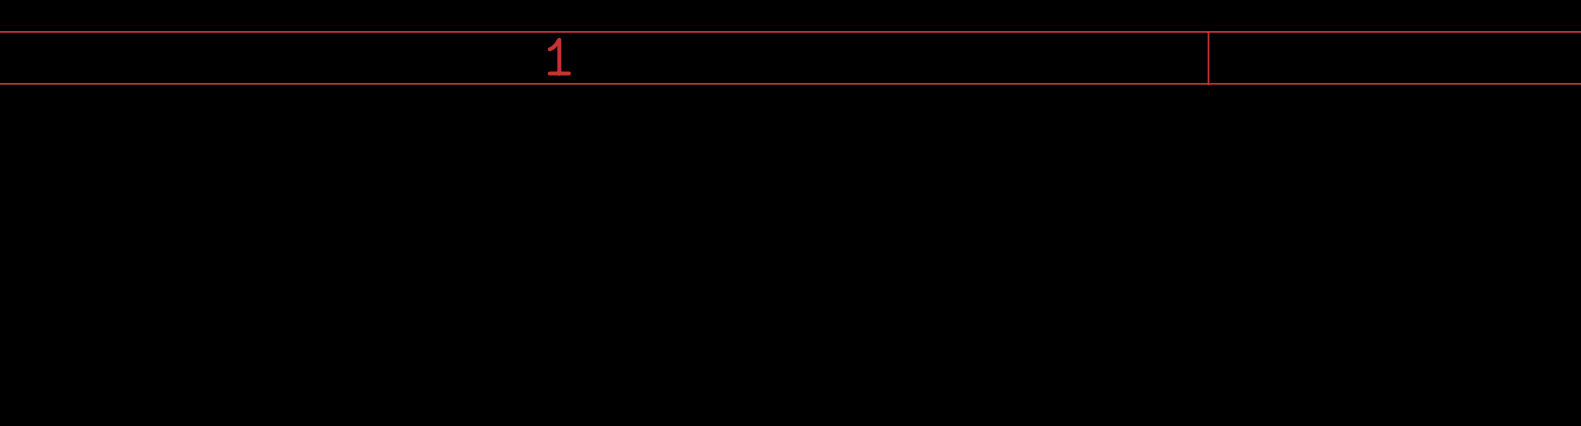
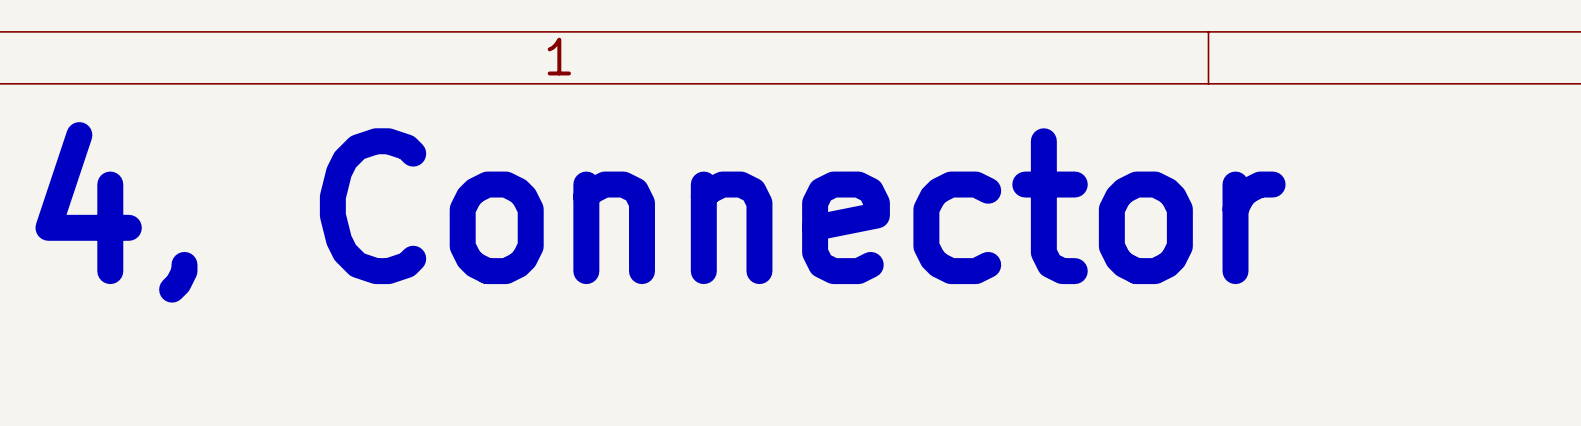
text: none -> 4, Connector (660, 212)

